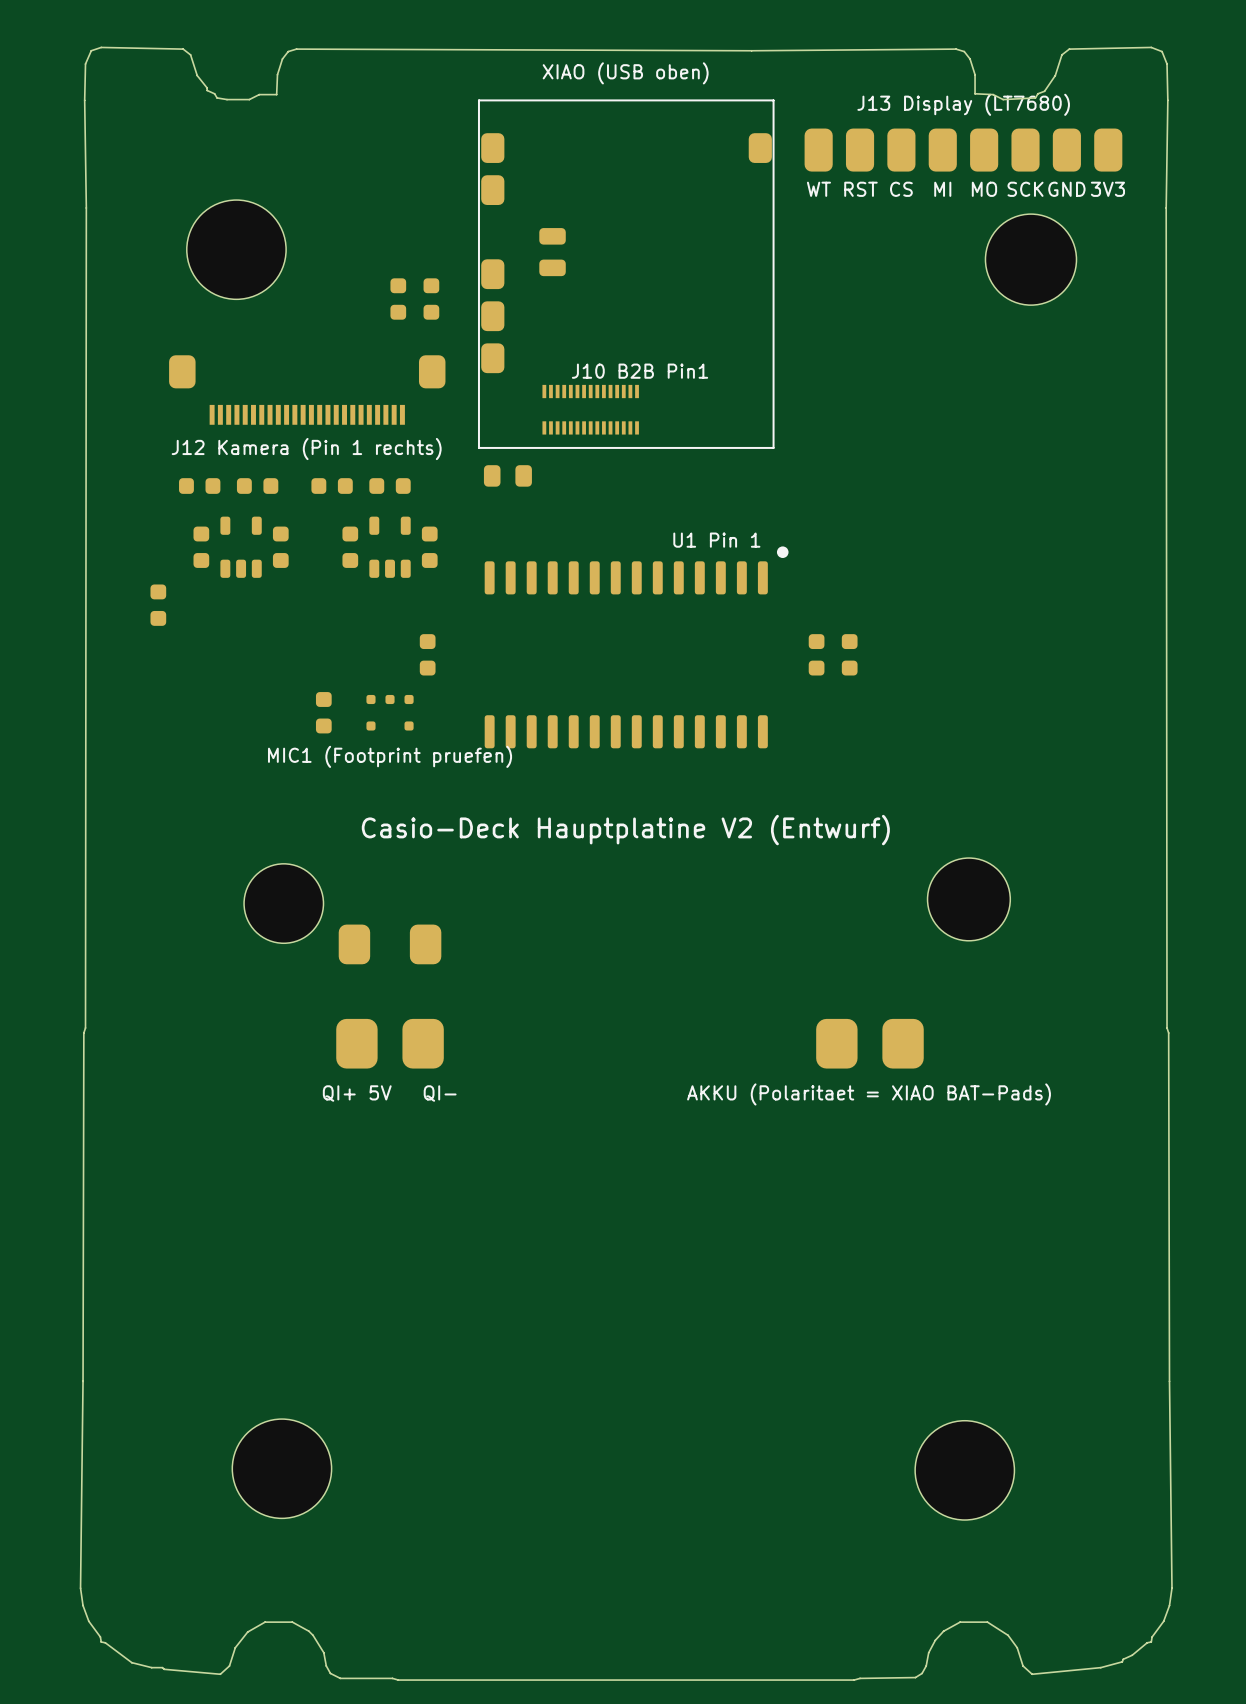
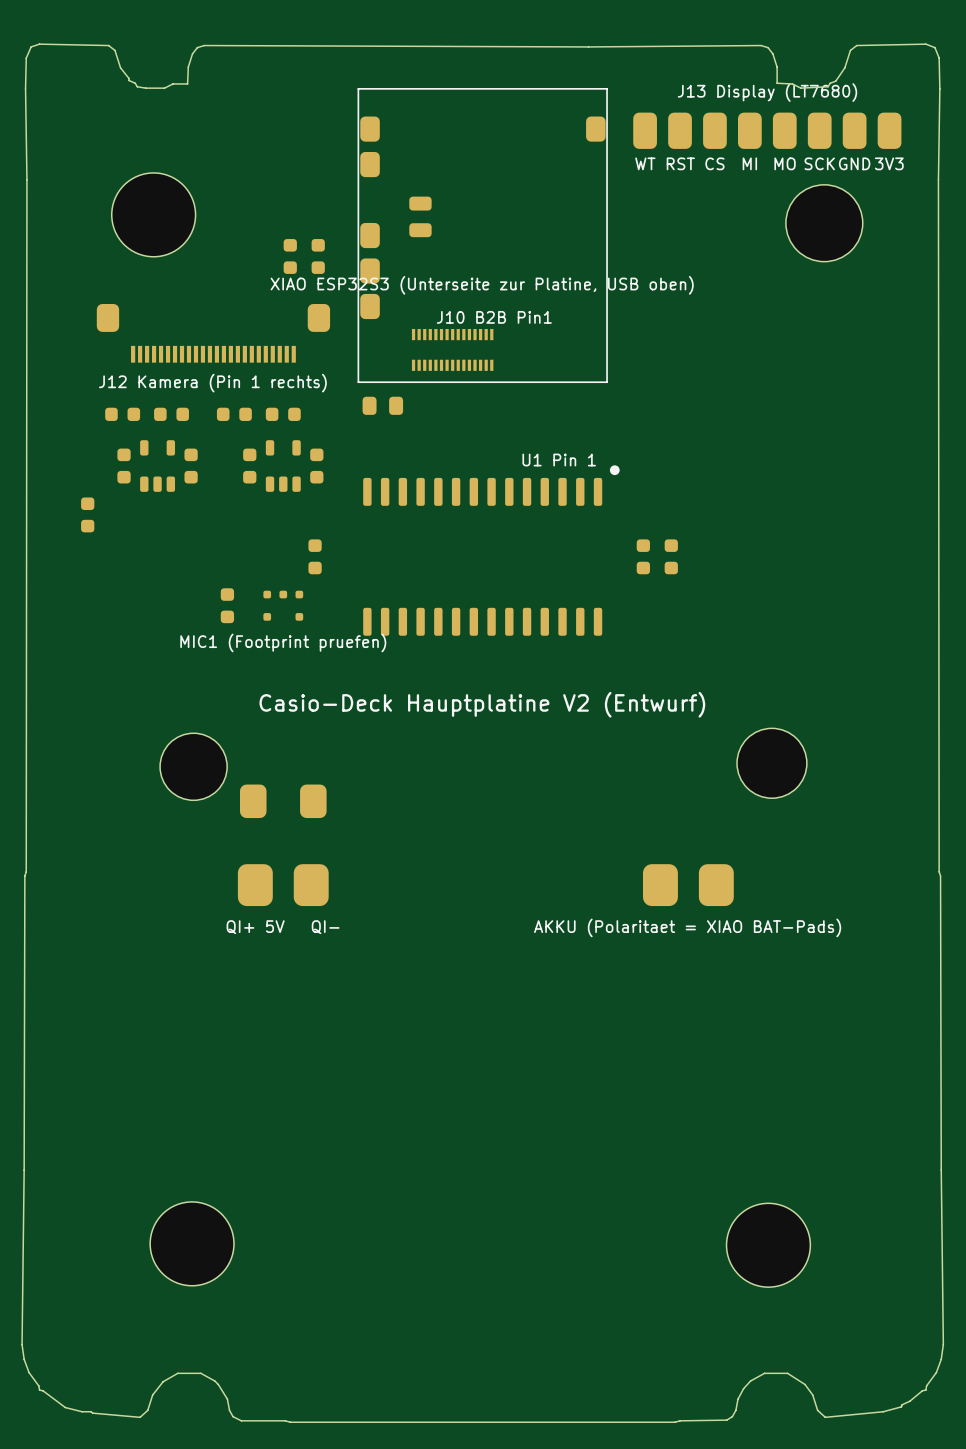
text: XIAO (USB oben) (625, 73) -> none
text: none -> XIAO ESP32S3 (Unterseite zur Platine, USB oben) (482, 285)

